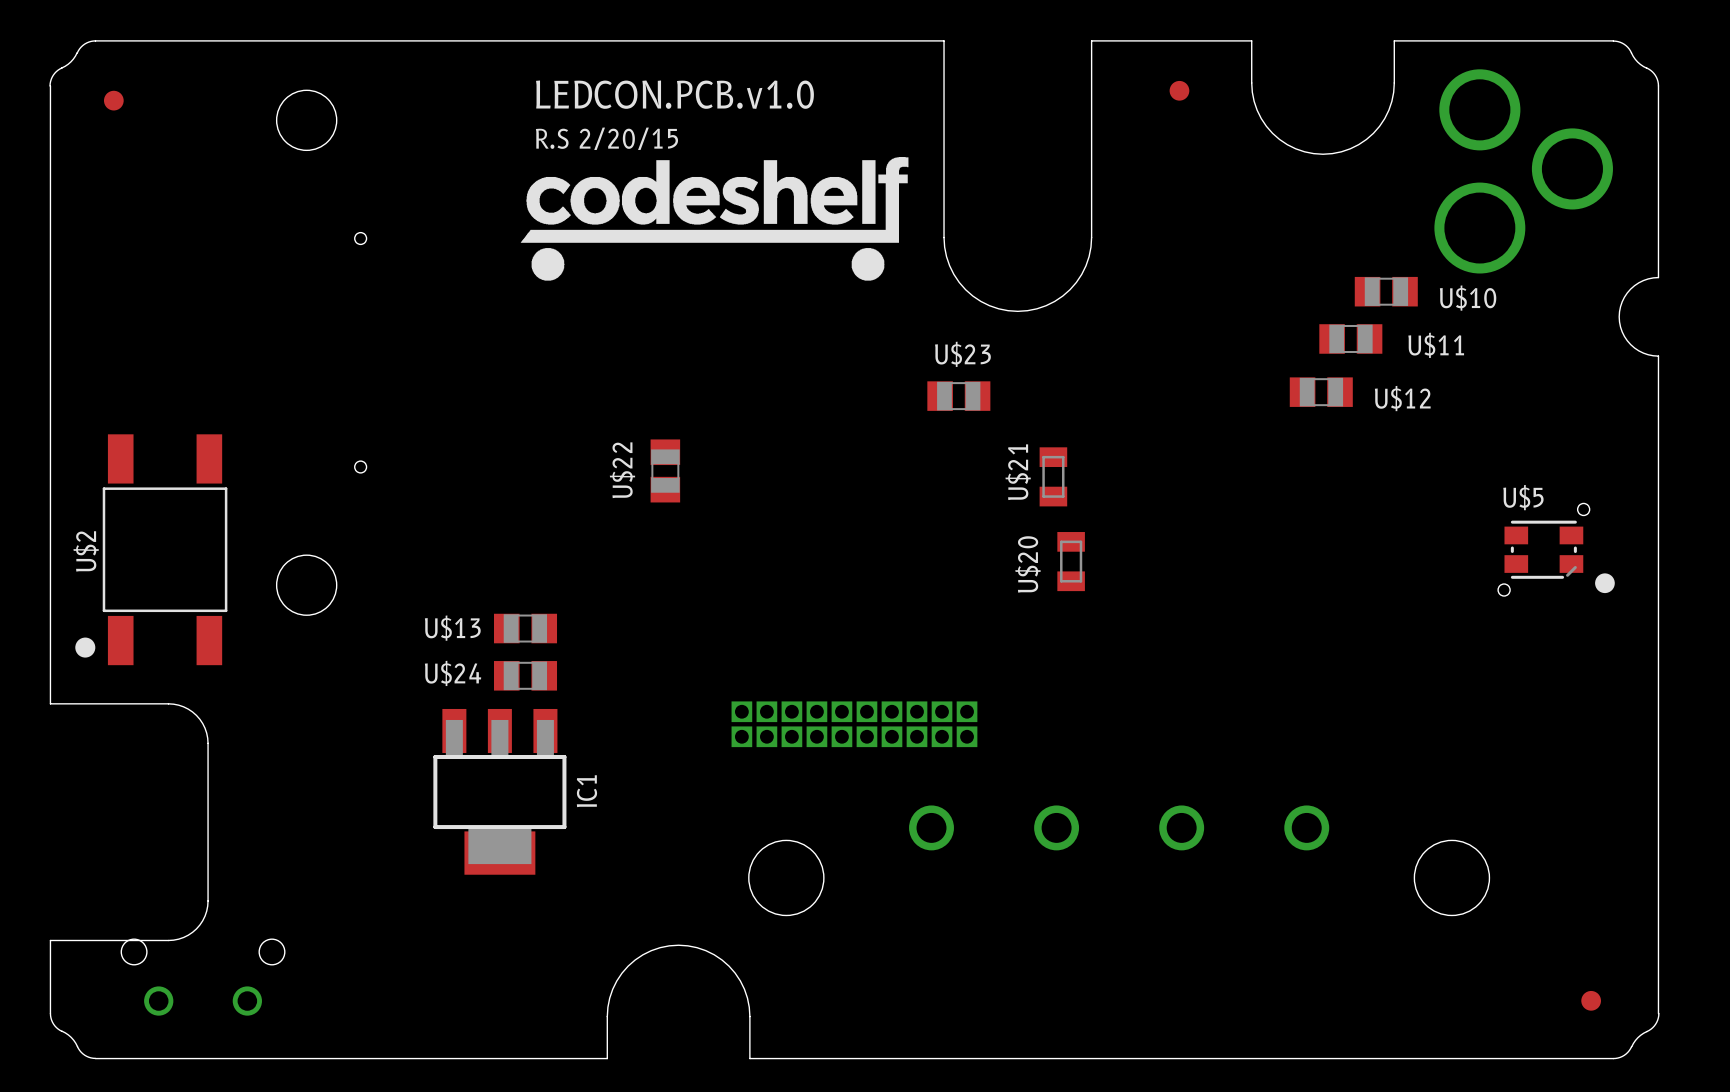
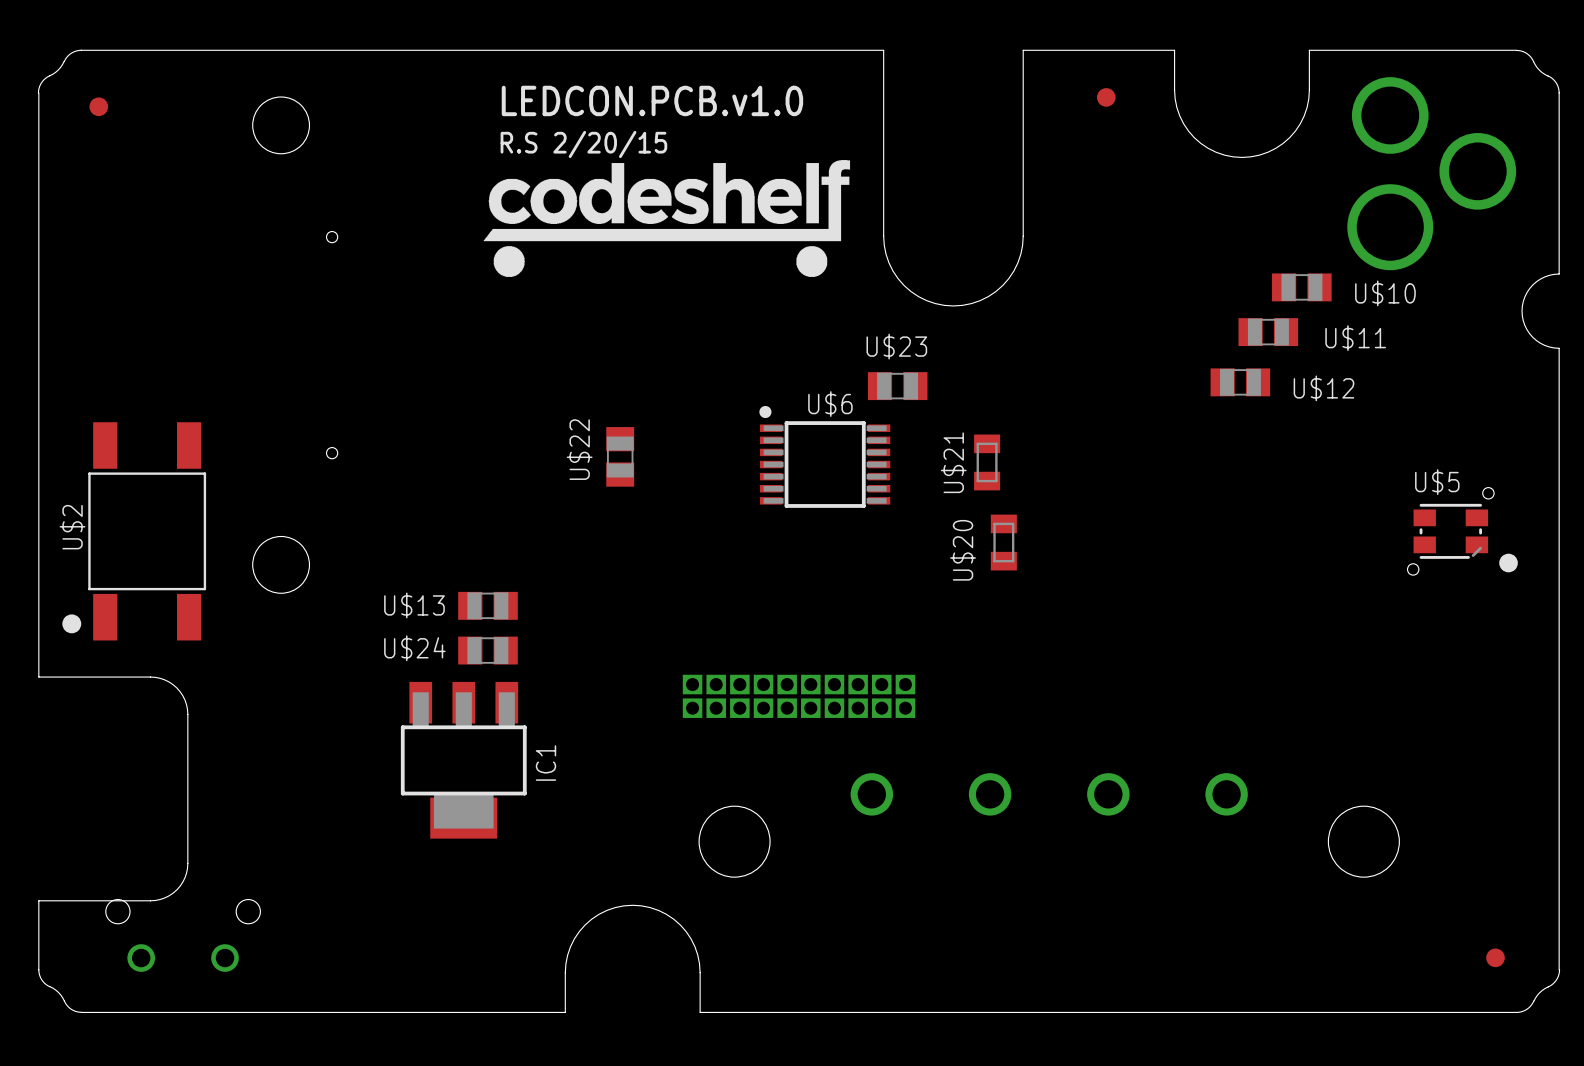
U$6: none -> (824, 456)

